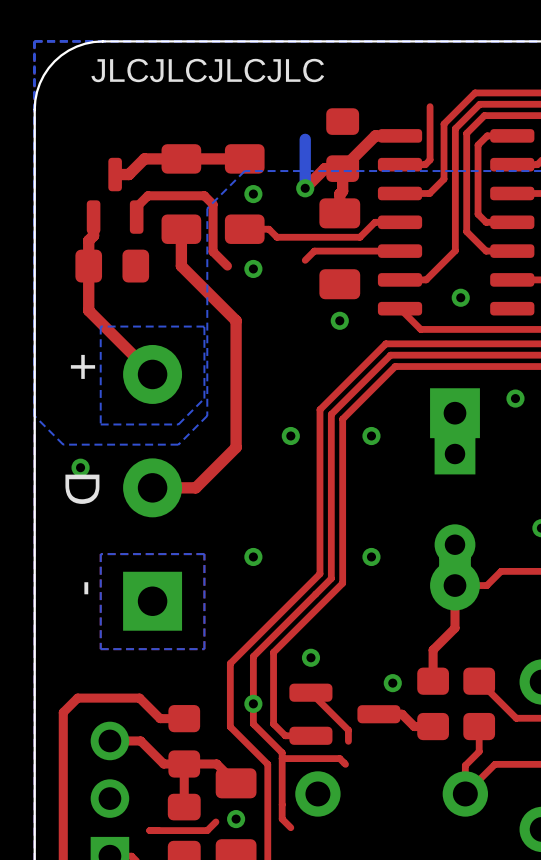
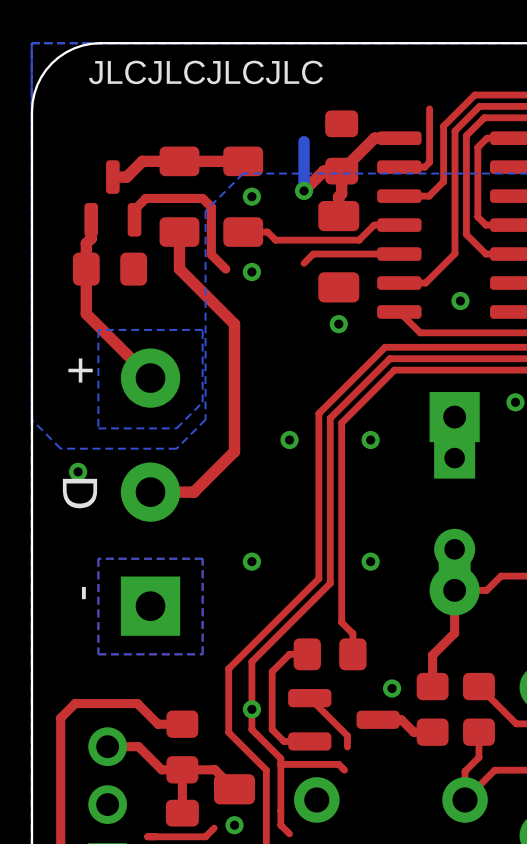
top track: (342, 583) (273, 652) (273, 666) -> (307, 654) (289, 654) (272, 671)
top track: none -> (341, 588) (341, 622) (352, 633) (352, 654)
part: none -> (330, 654)
via: (310, 657) -> none

